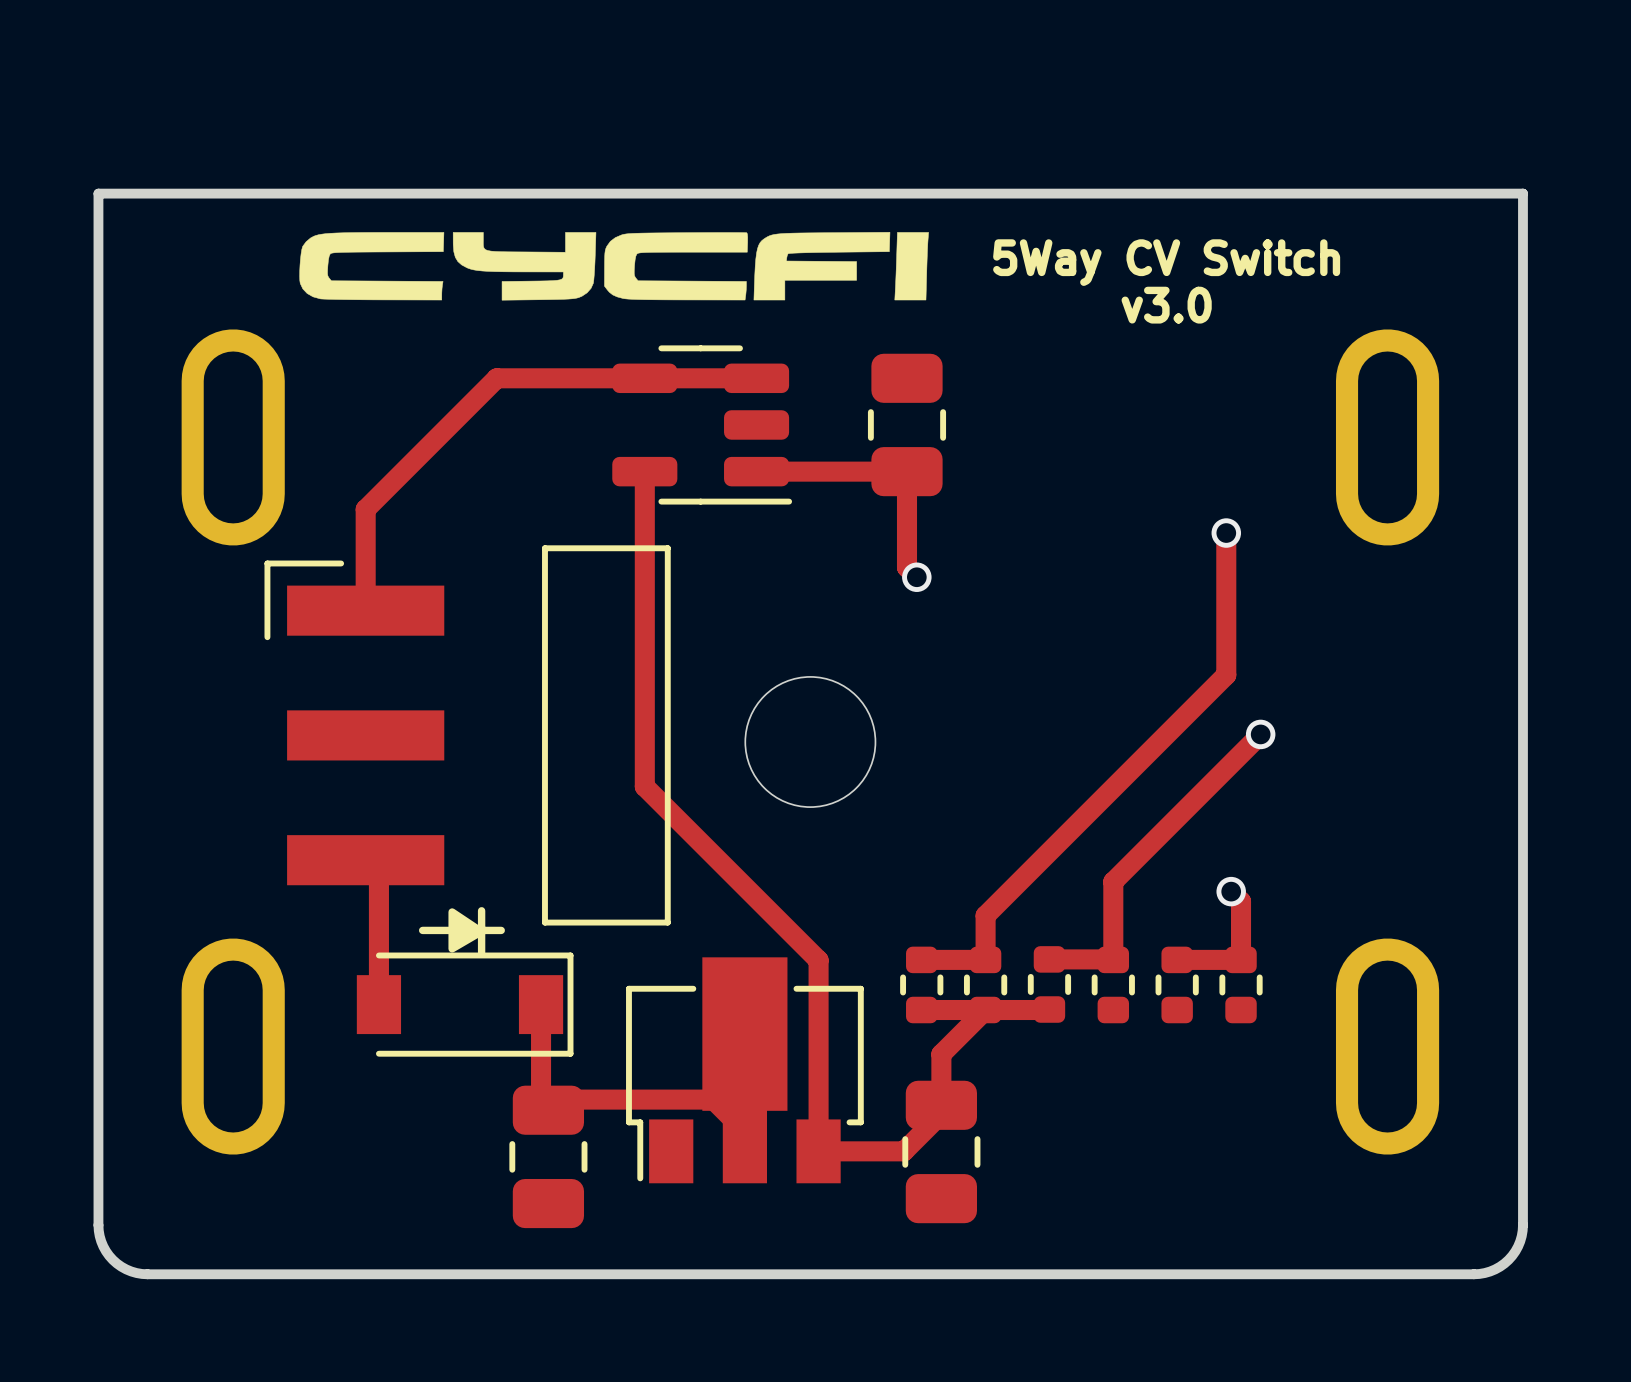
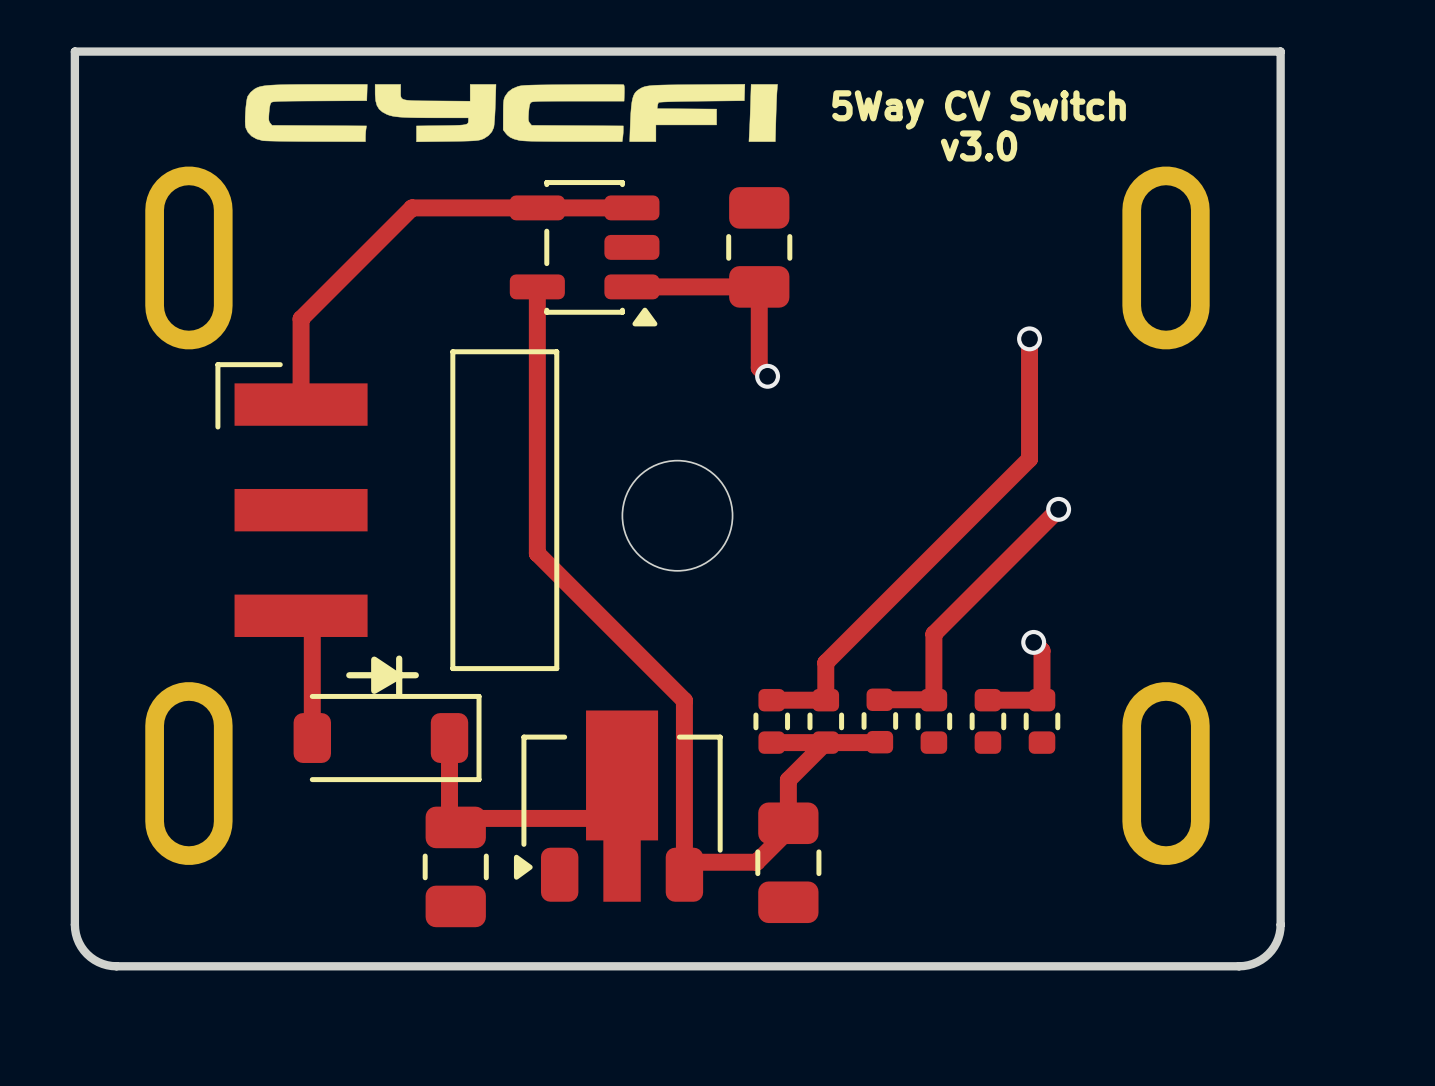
part footprint: [612, 345, 793, 505] -> [509, 180, 660, 327]
part footprint: [356, 952, 574, 1057] -> [293, 693, 482, 783]
part footprint: [626, 957, 864, 1184] -> [513, 710, 723, 902]

